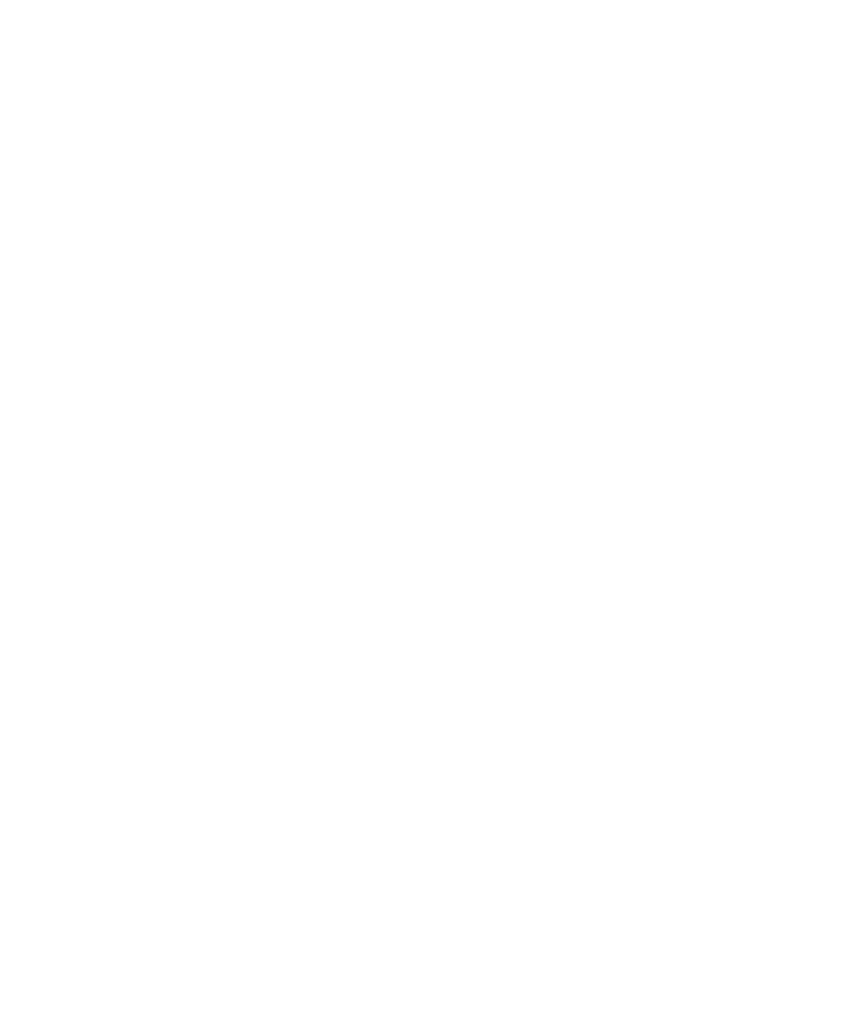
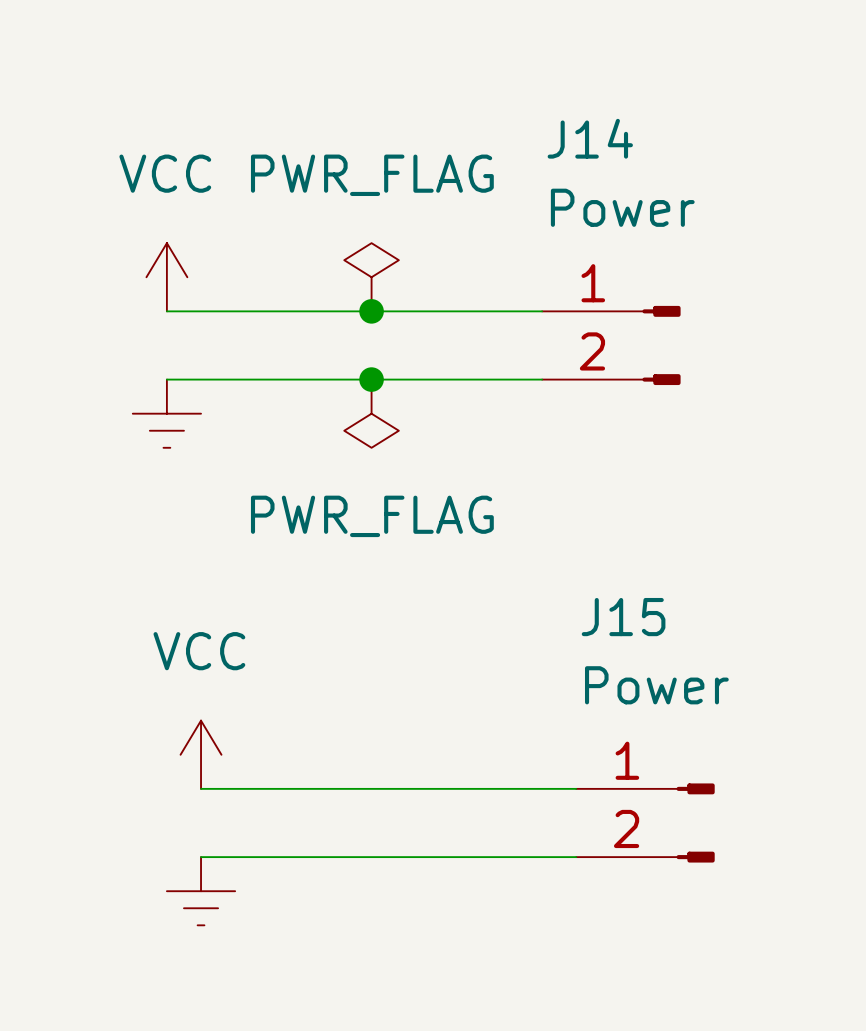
power symbol: none -> VCC (166, 277)
power symbol: none -> PWR_FLAG (371, 277)
wire: none -> (166, 311) (542, 311)
junction: none -> (371, 311)
J14: none -> Power (611, 345)
wire: none -> (166, 379) (542, 379)
junction: none -> (371, 379)
power symbol: none -> (166, 413)
power symbol: none -> PWR_FLAG (371, 413)
power symbol: none -> VCC (201, 754)
wire: none -> (201, 788) (576, 788)
J15: none -> Power (645, 822)
wire: none -> (201, 857) (576, 857)
power symbol: none -> (201, 891)

